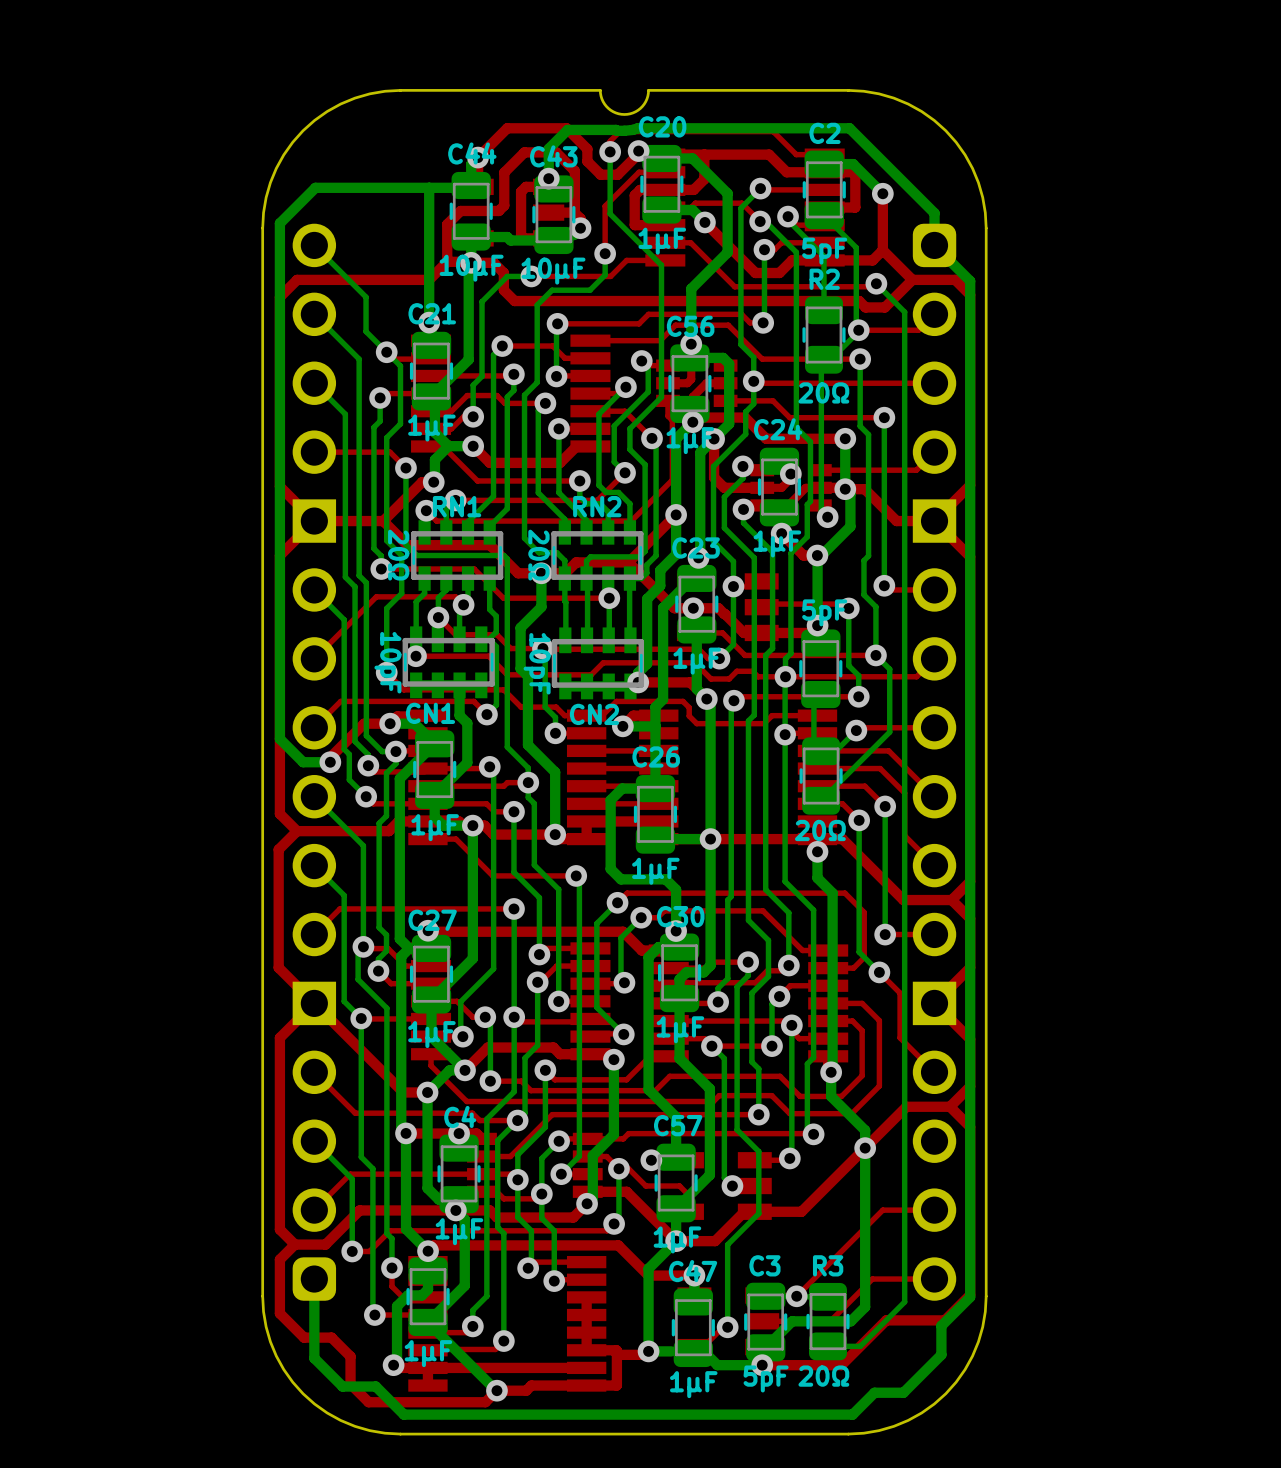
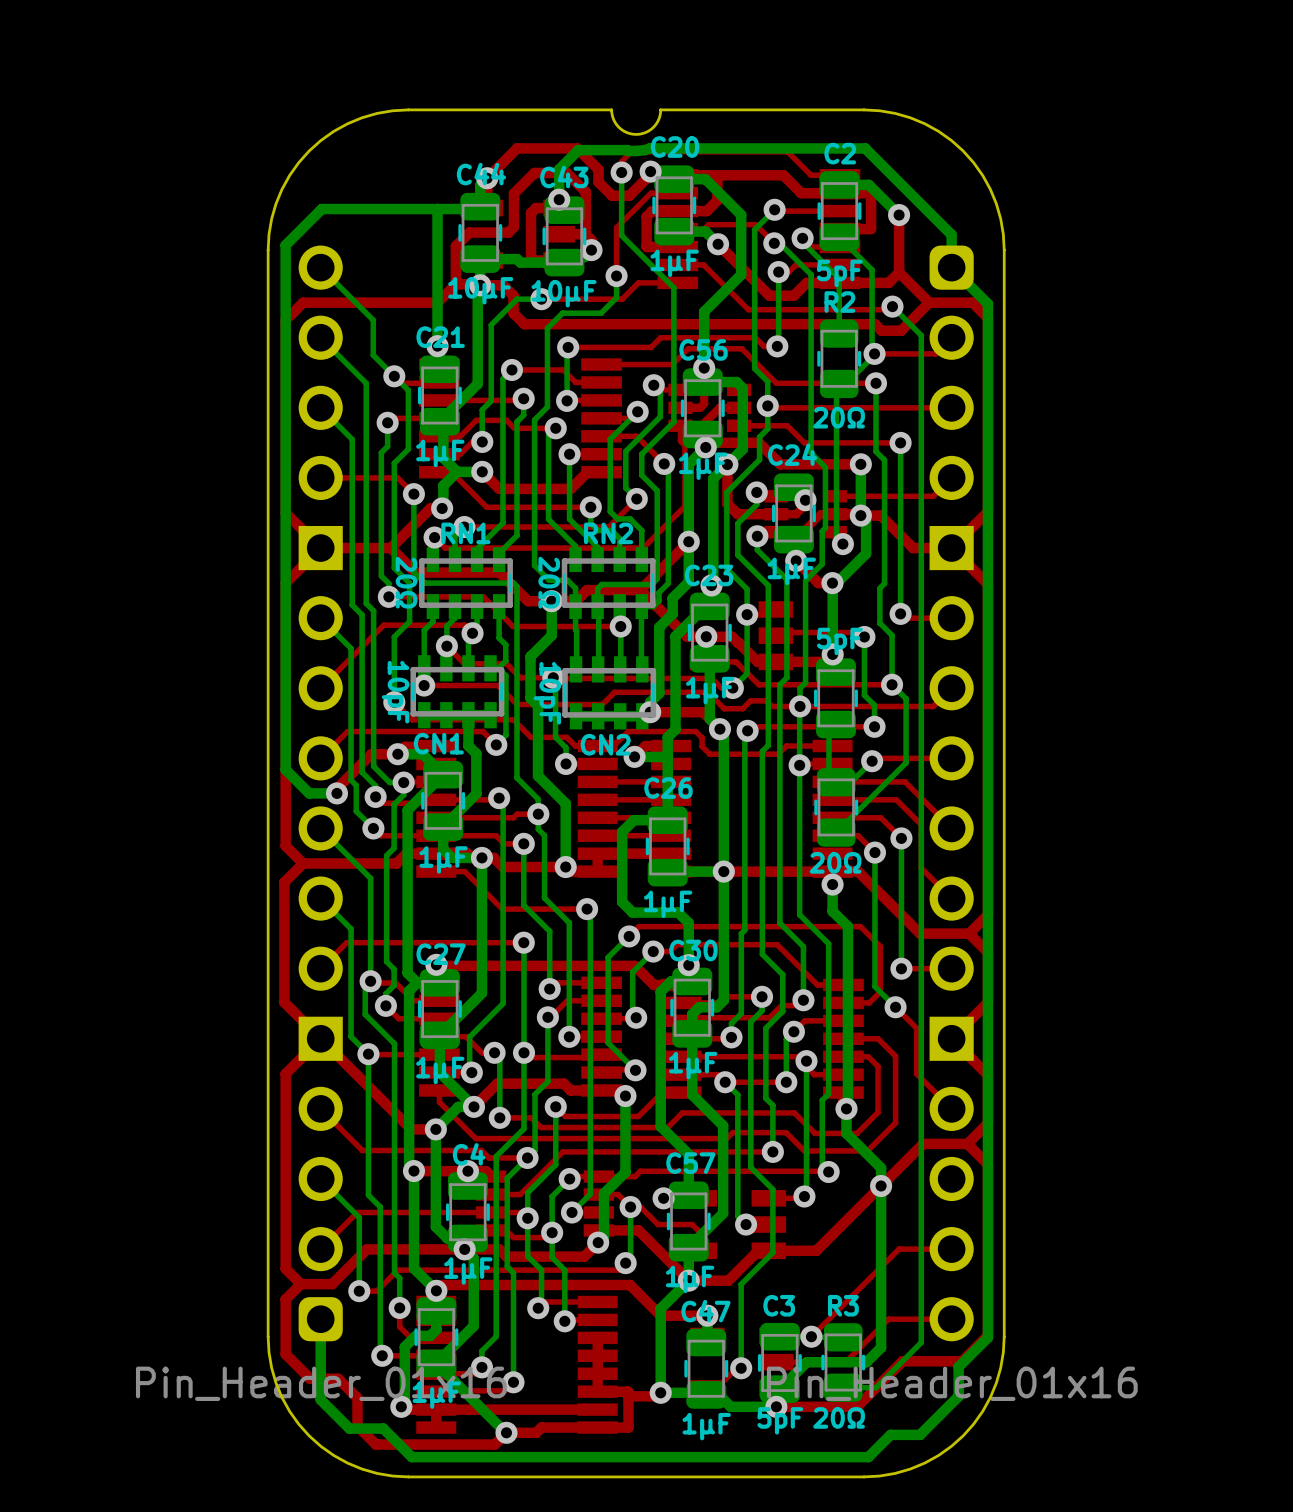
drawing: none -> [135, 1366, 507, 1401]
drawing: none -> [766, 1366, 1138, 1401]

